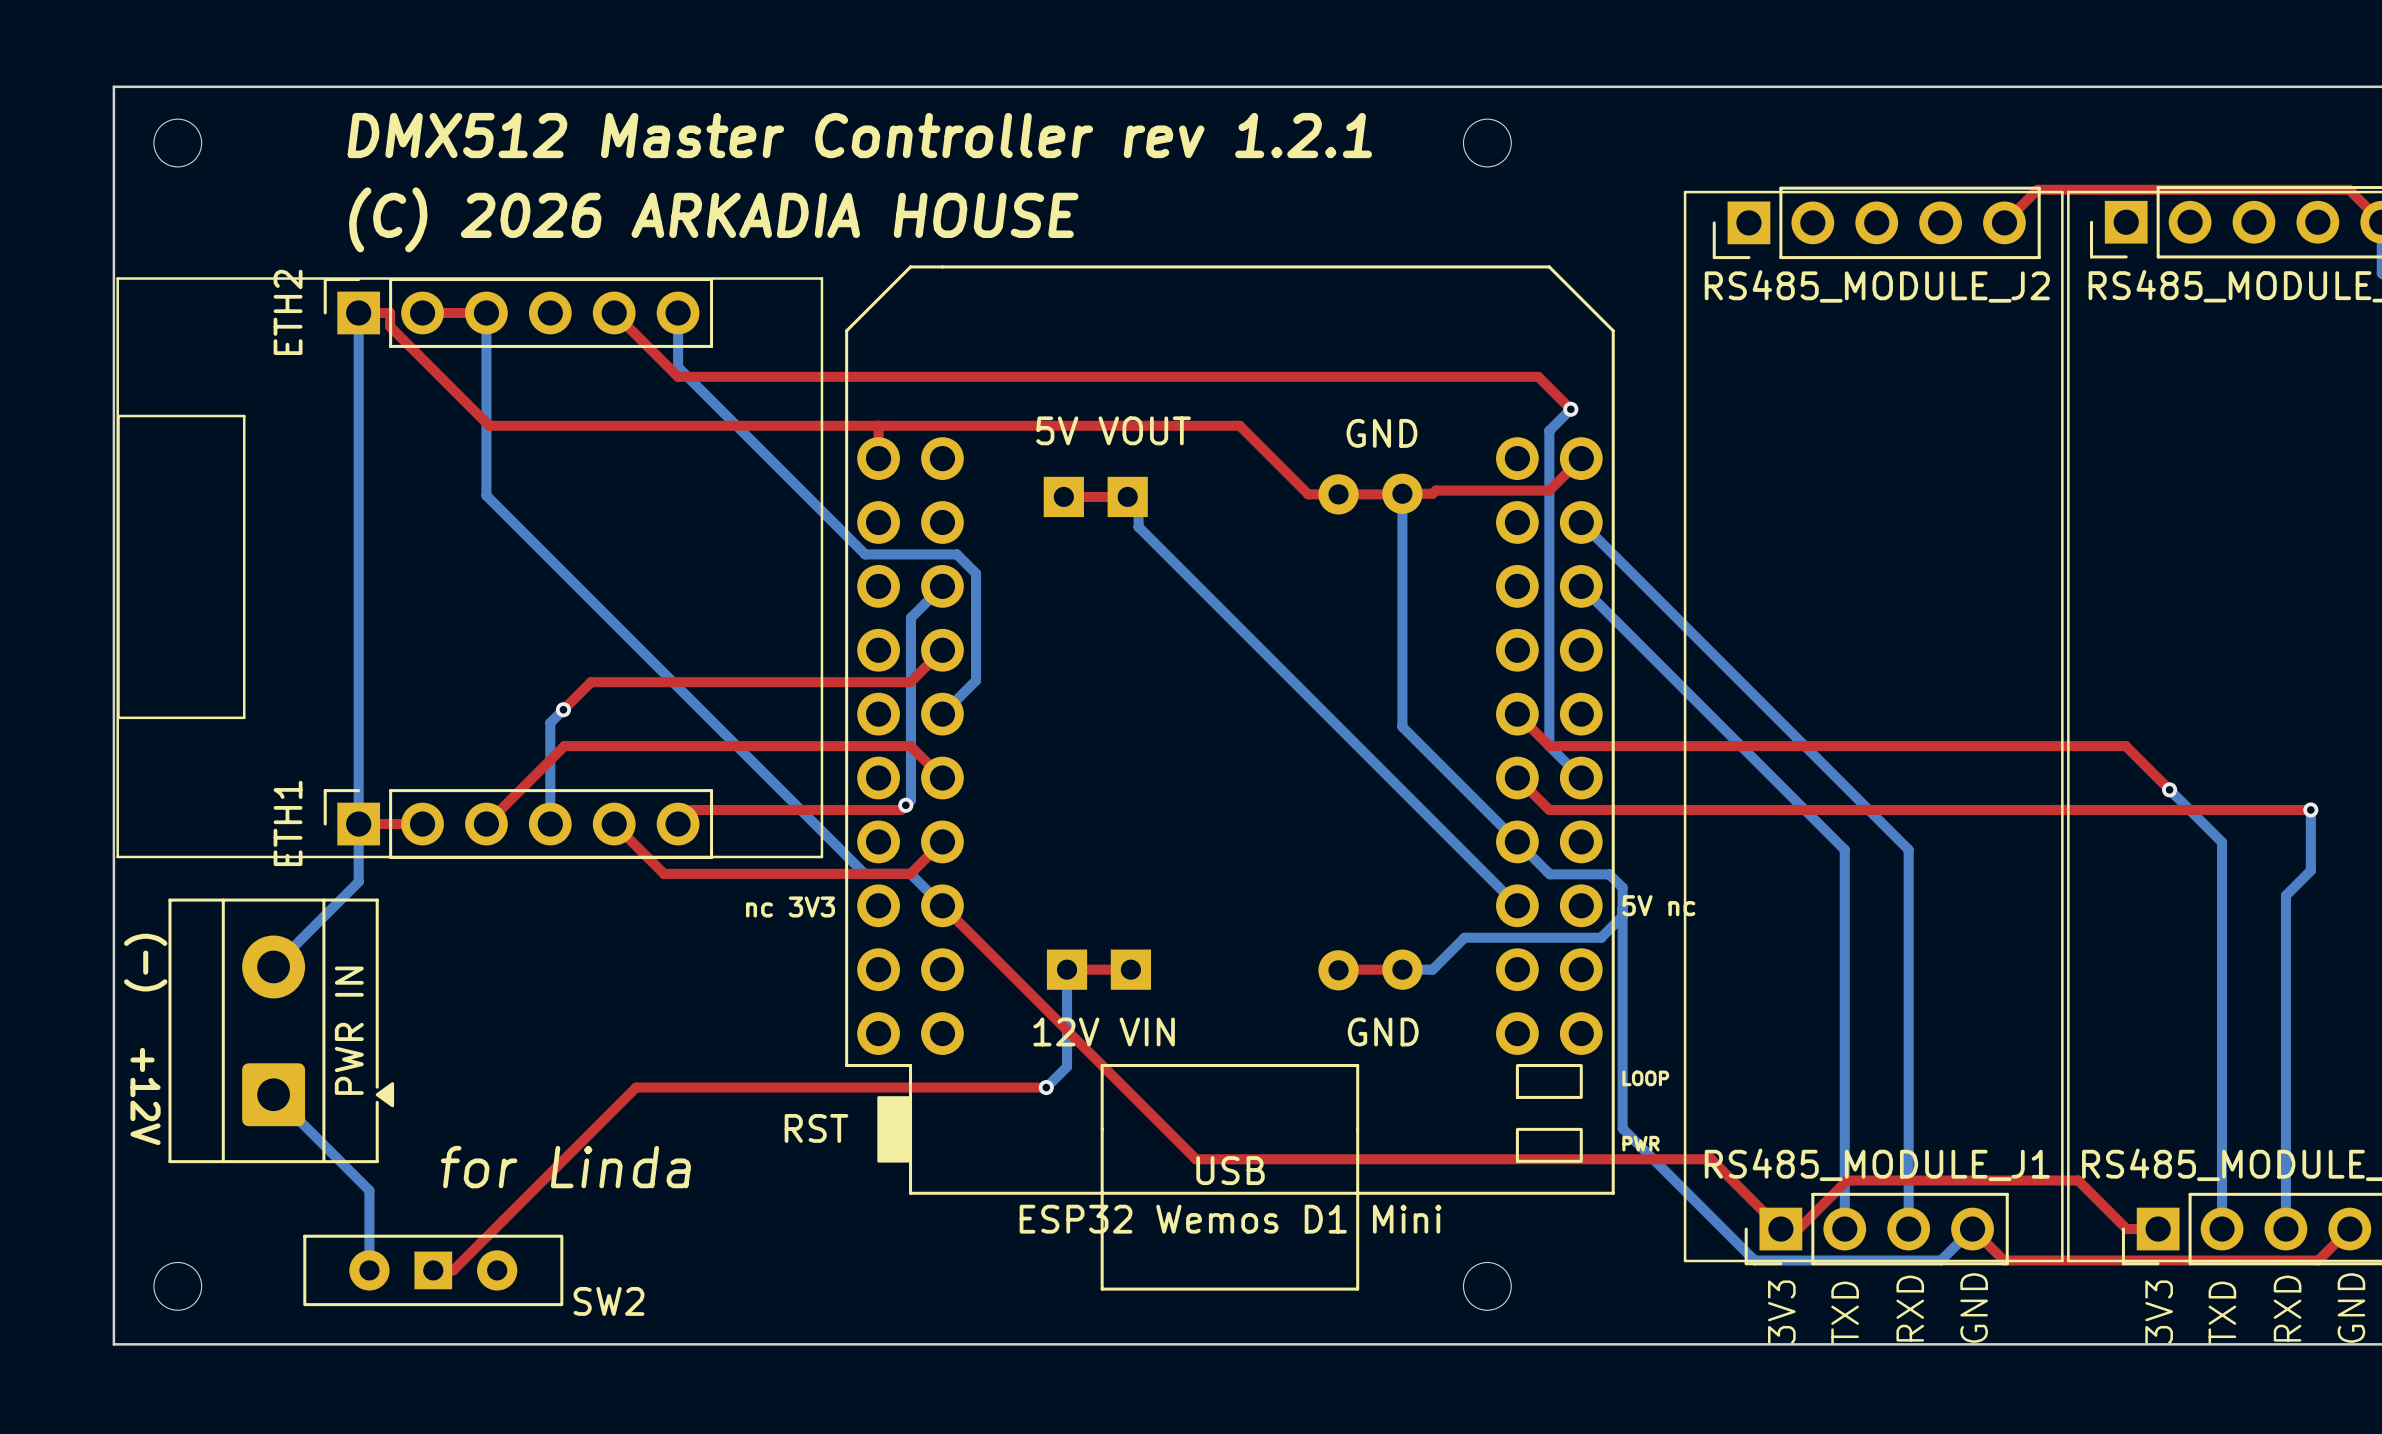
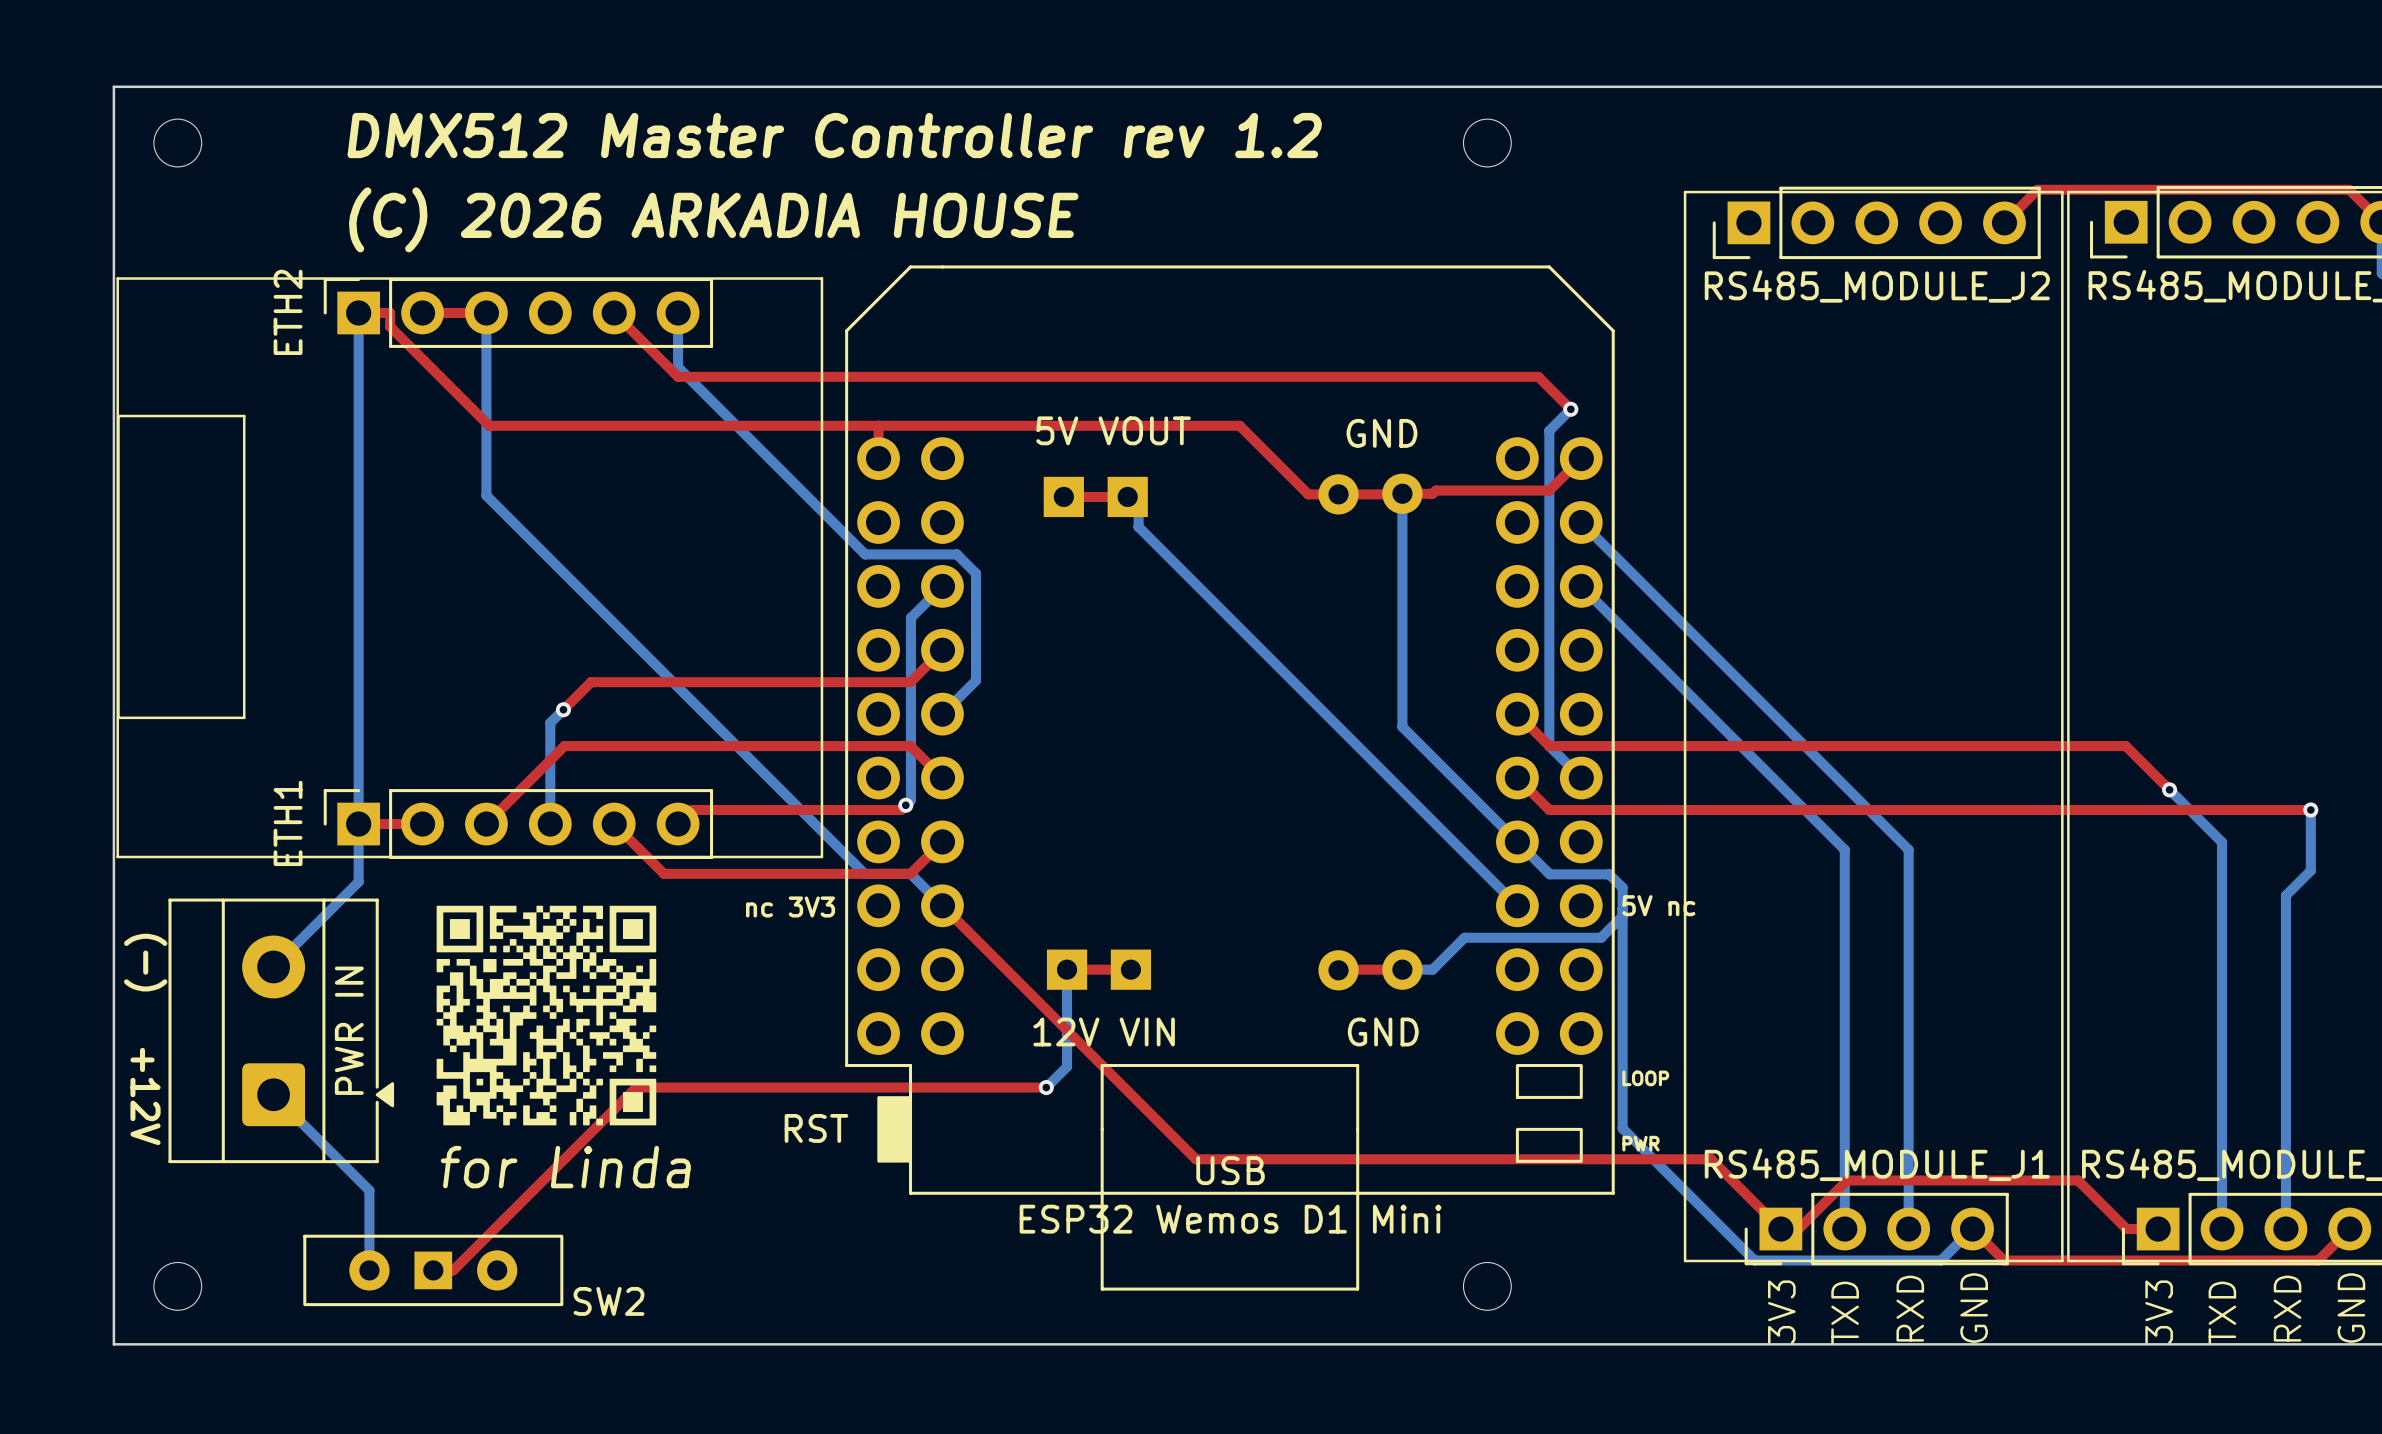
text: DMX512 Master Controller rev 1.2.1 (859, 135) -> DMX512 Master Controller rev 1.2 (834, 135)
drawing: none -> [436, 905, 657, 1126]

